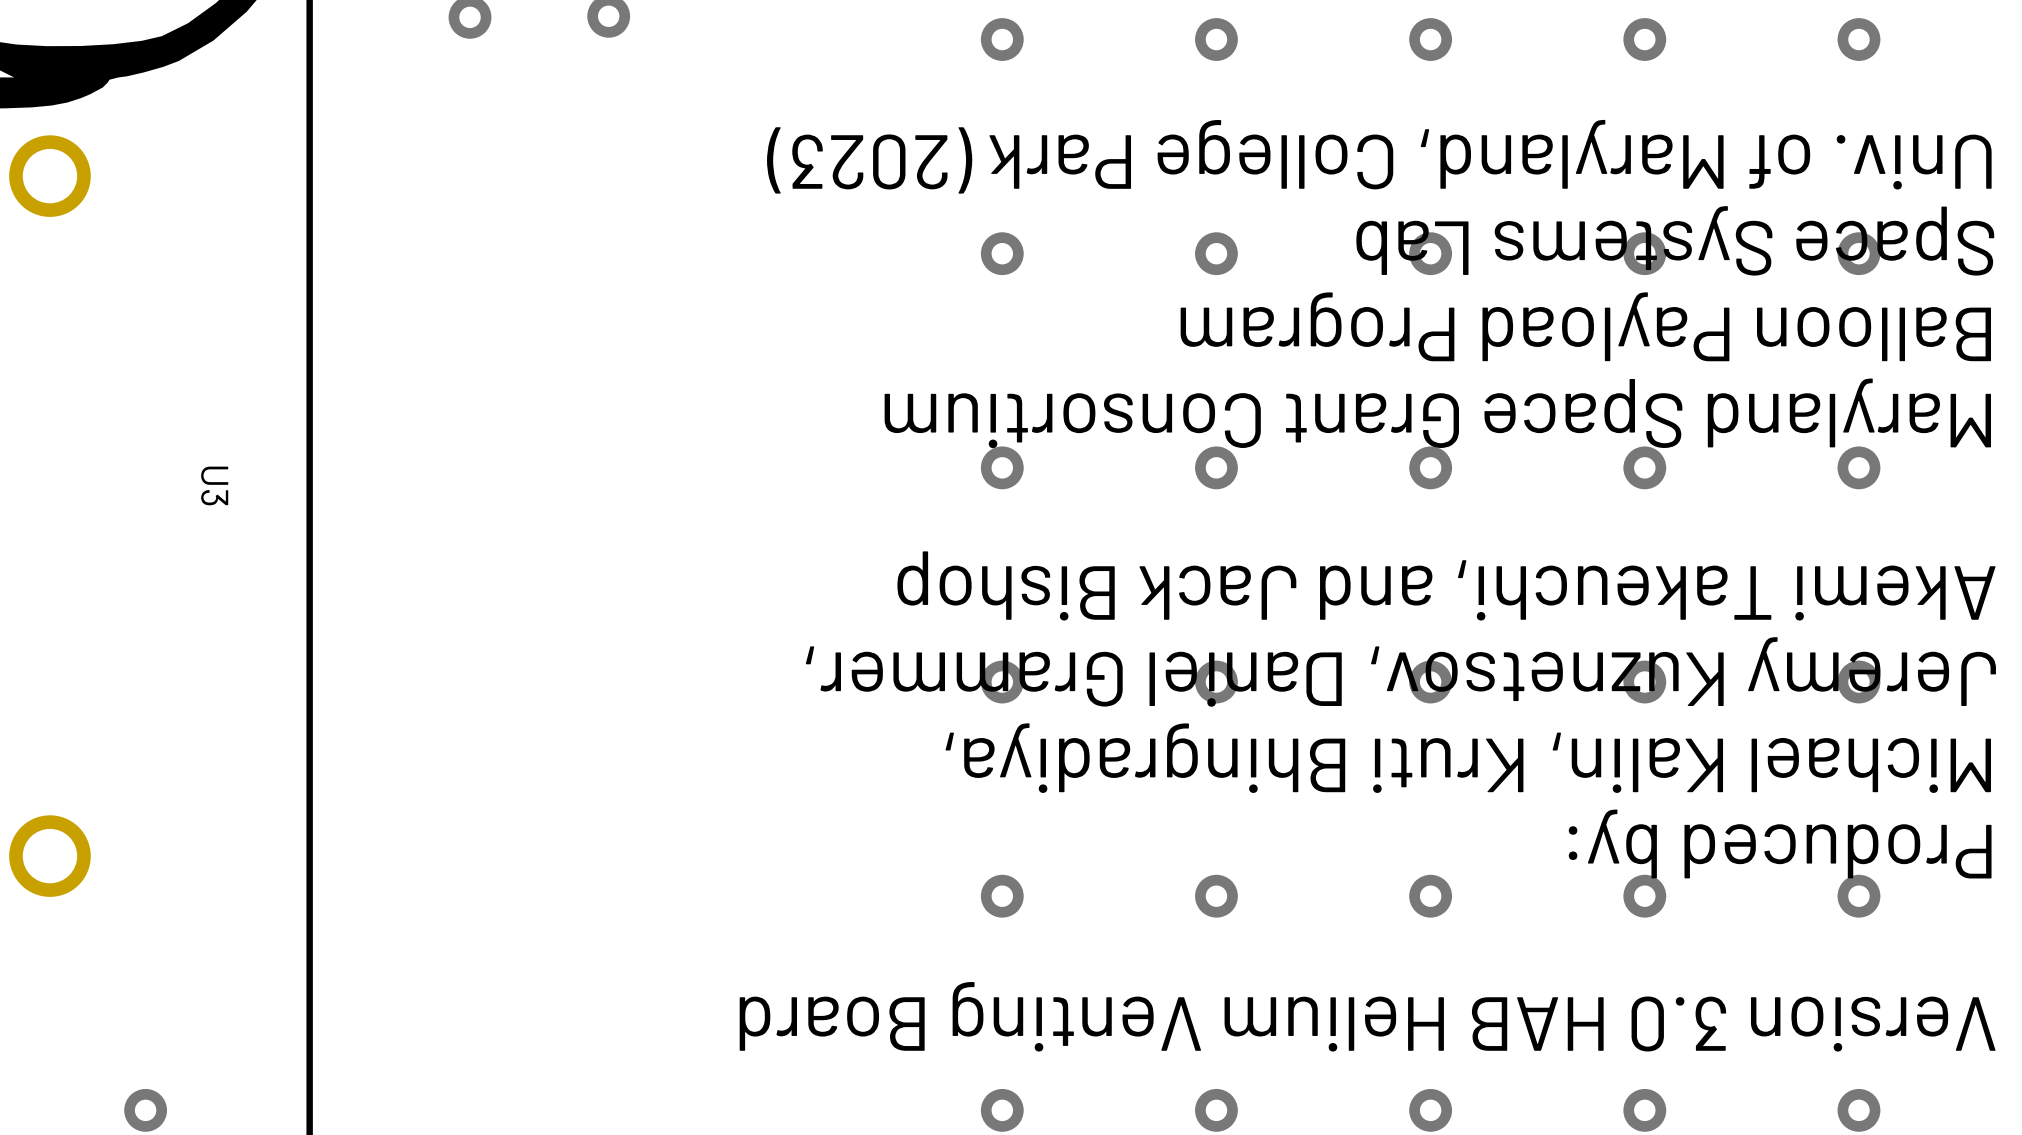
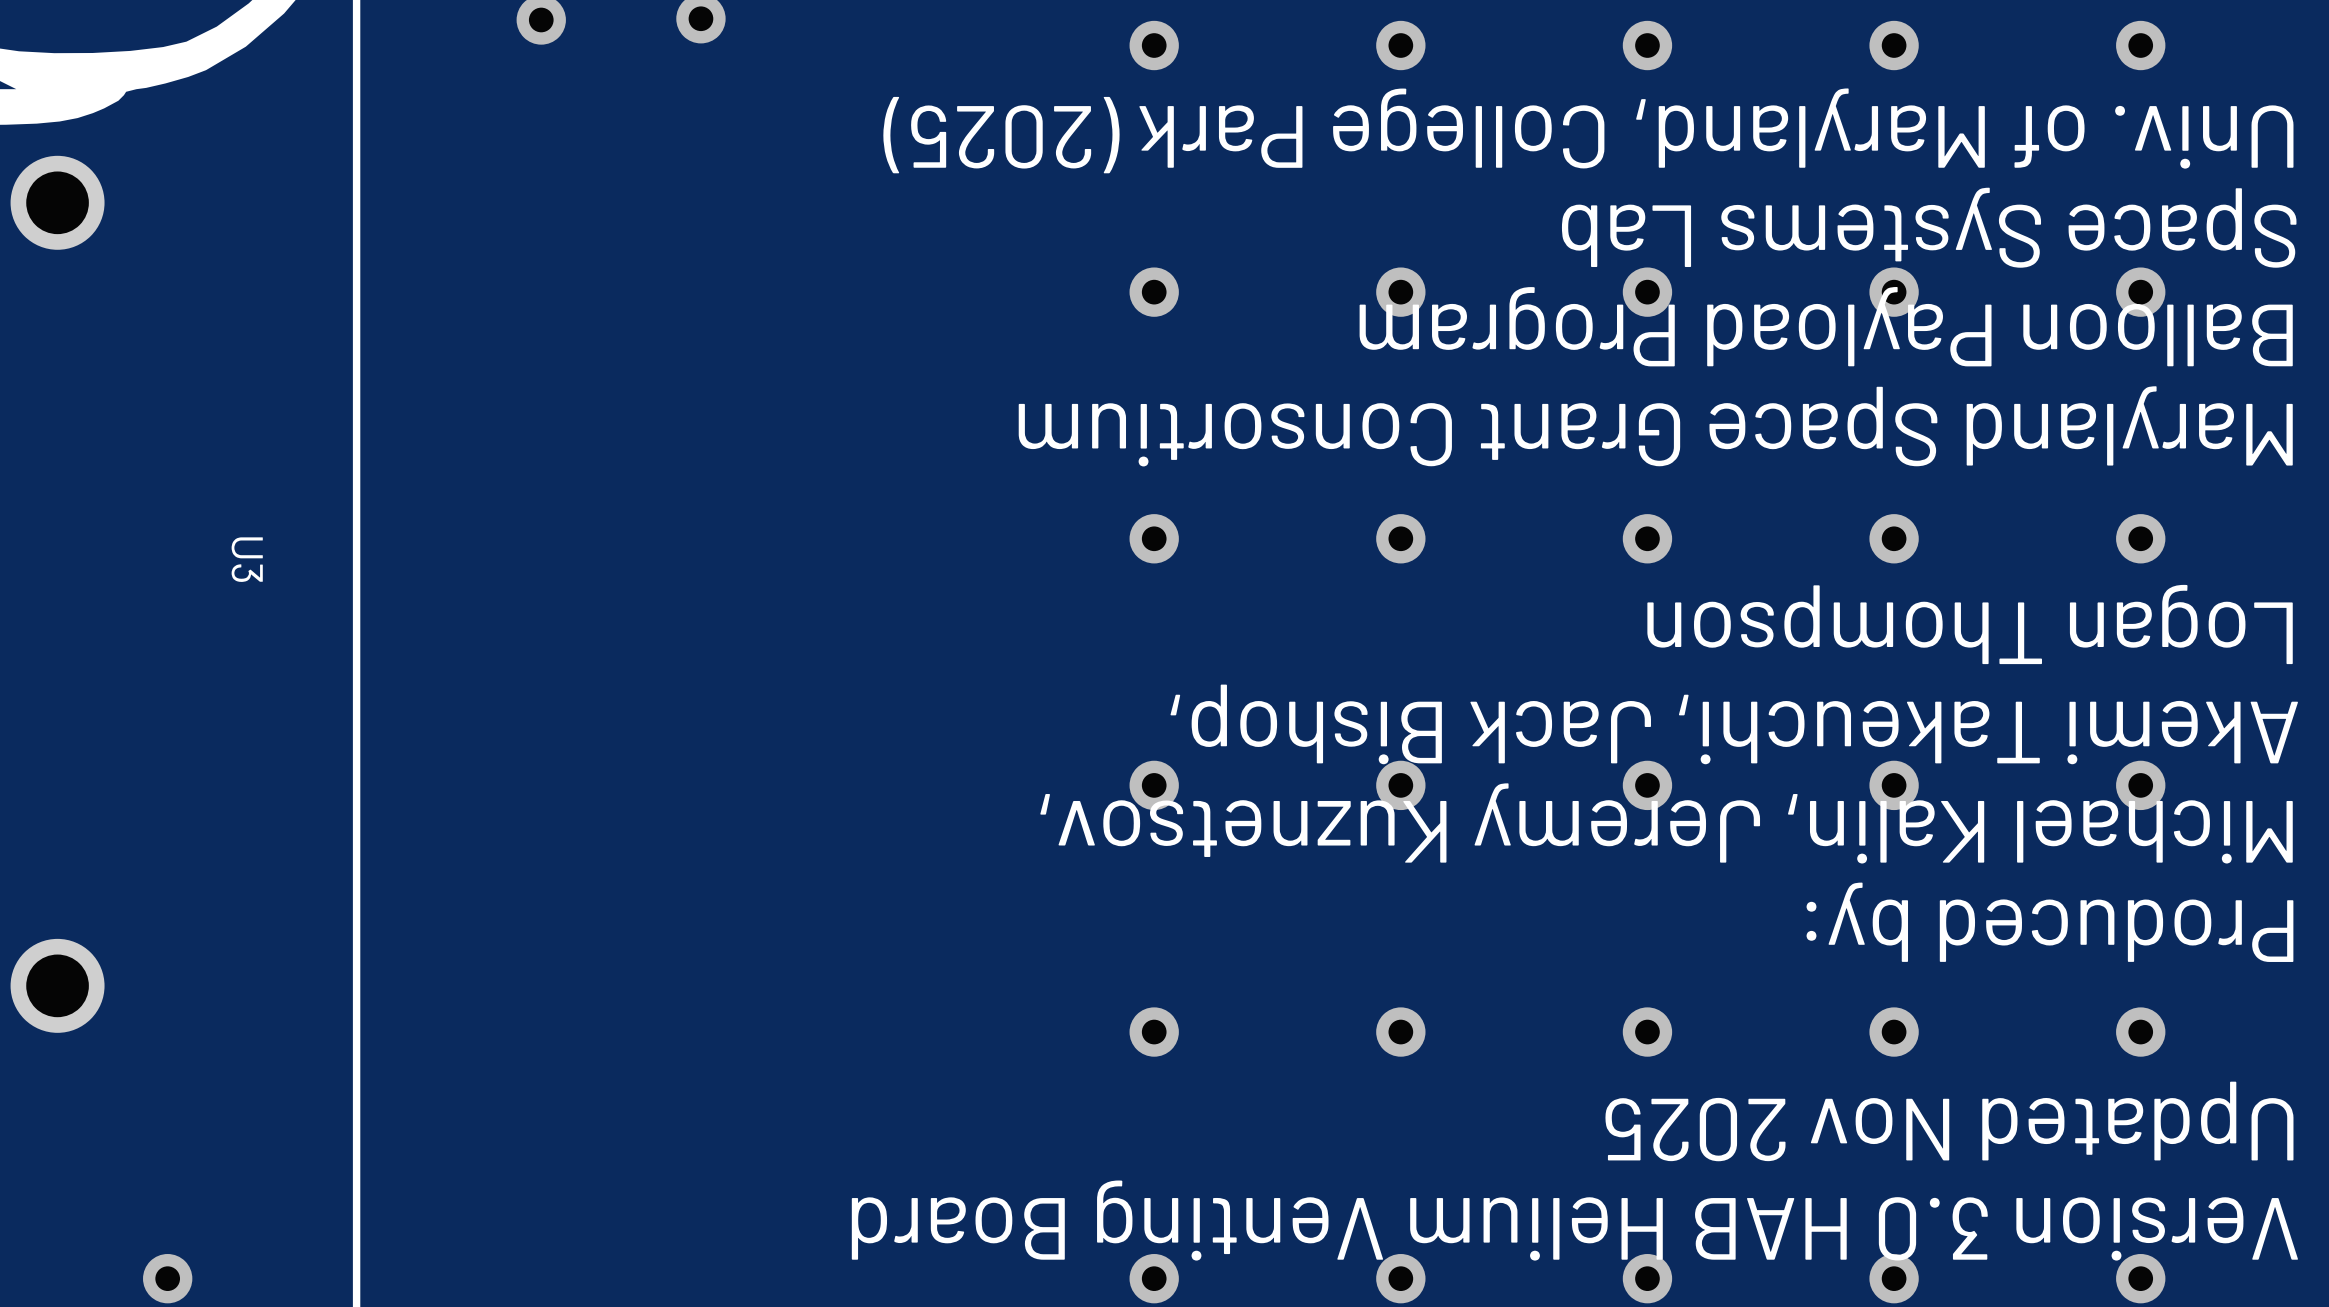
text: Univ. of Maryland, College Park (2023) (1379, 156) -> Univ. of Maryland, College Park (2025) (1588, 130)
text position: Space Systems Lab (1675, 240) -> Space Systems Lab (1929, 227)
text position: Balloon Payload Program (1585, 326) -> Balloon Payload Program (1826, 326)
text position: Maryland Space Grant Consortium (1437, 413) -> Maryland Space Grant Consortium (1655, 426)
text: none -> Logan Thompson (1970, 624)
text: Akemi Takeuchi, and Jack Bishop (1446, 585) -> Akemi Takeuchi, Jack Bishop, (1734, 724)
text: Jeremy Kuznetsov, Daniel Grammer, (1400, 671) -> none
text: none -> Michael Kalin, Jeremy Kuznetsov, (1666, 823)
text: Michael Kalin, Kruti Bhingradiya, (1468, 758) -> none
text position: Produced by: (1780, 844) -> Produced by: (2049, 922)
text: none -> Updated Nov 2025 (1949, 1121)
text position: Version 3.0 HAB Helium Venting Board (1367, 1016) -> Version 3.0 HAB Helium Venting Board (1574, 1220)

